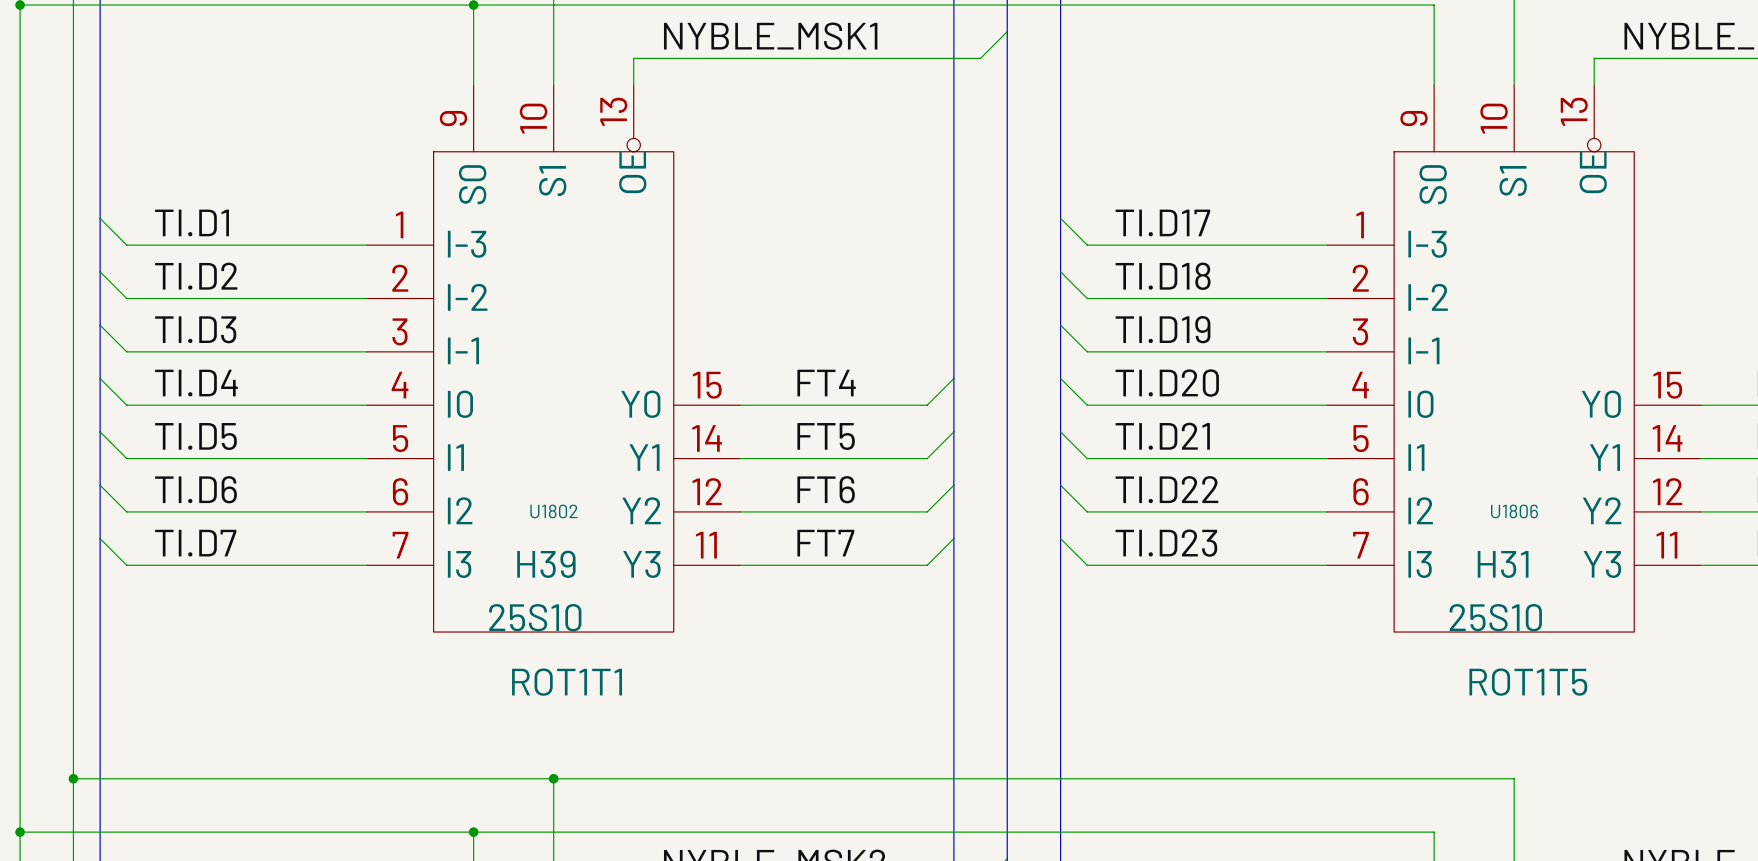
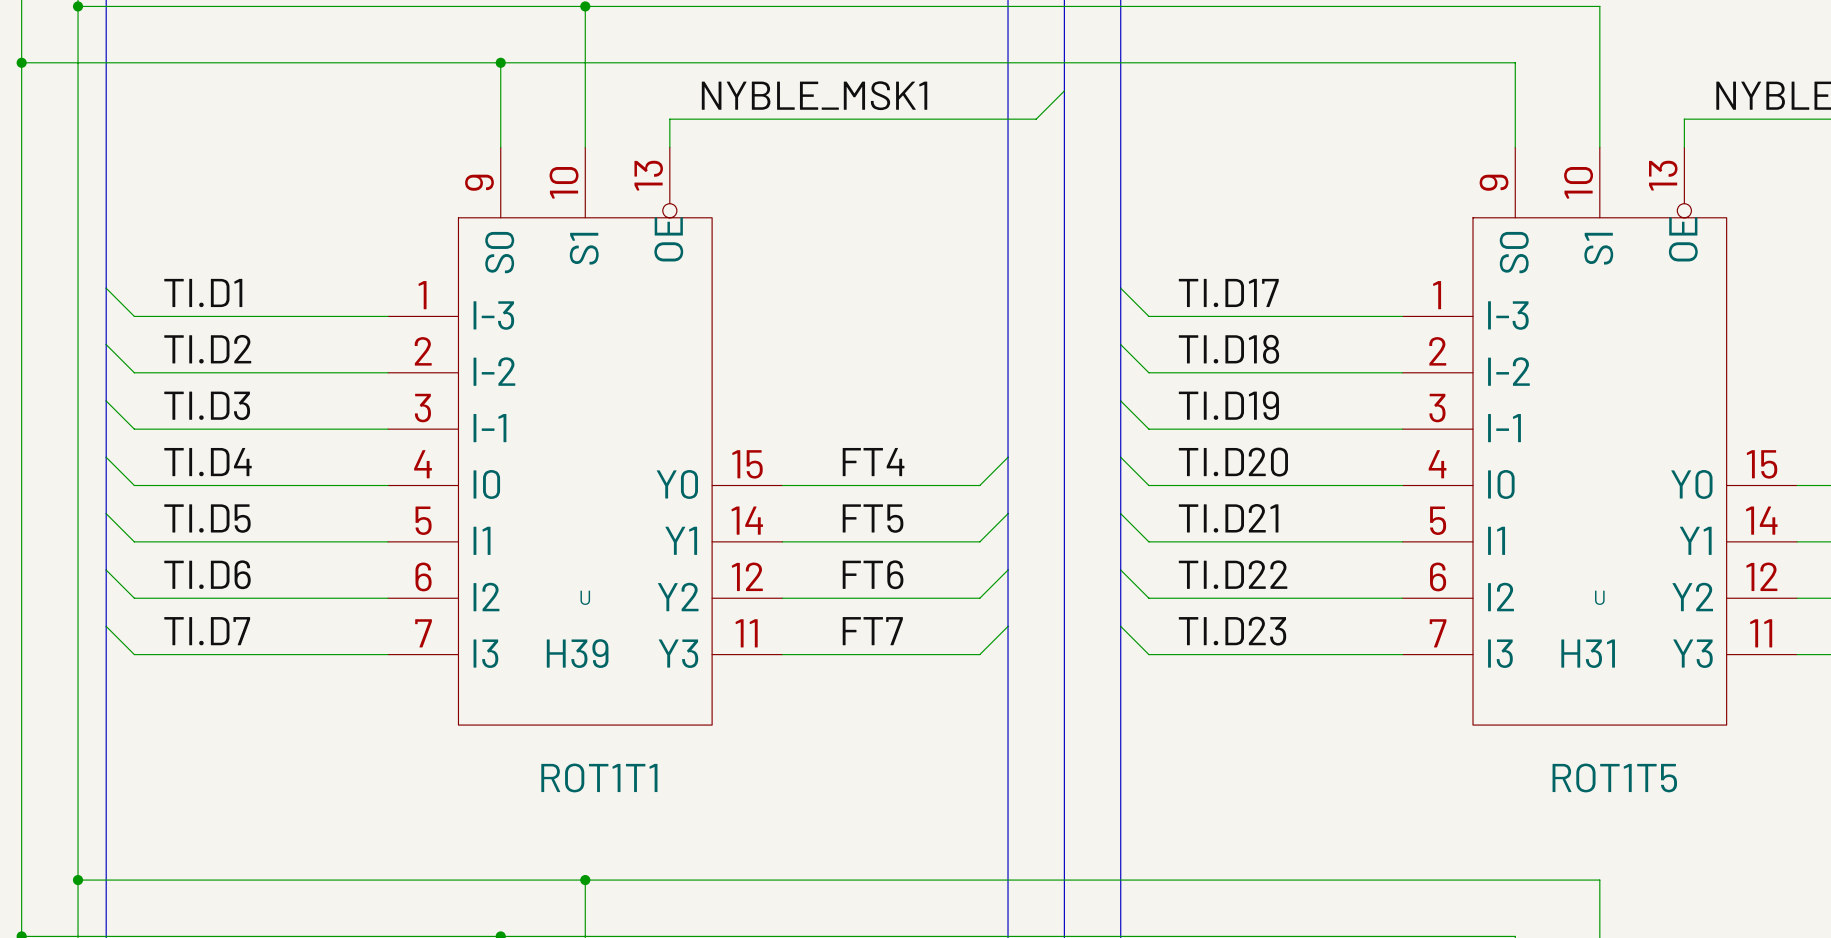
U1802 name: U1802 (553, 511) -> U (585, 597)
U1806 name: U1806 (1514, 511) -> U (1599, 597)
U1802 value: 25S10 (535, 617) -> none
U1806 value: 25S10 (1495, 617) -> none

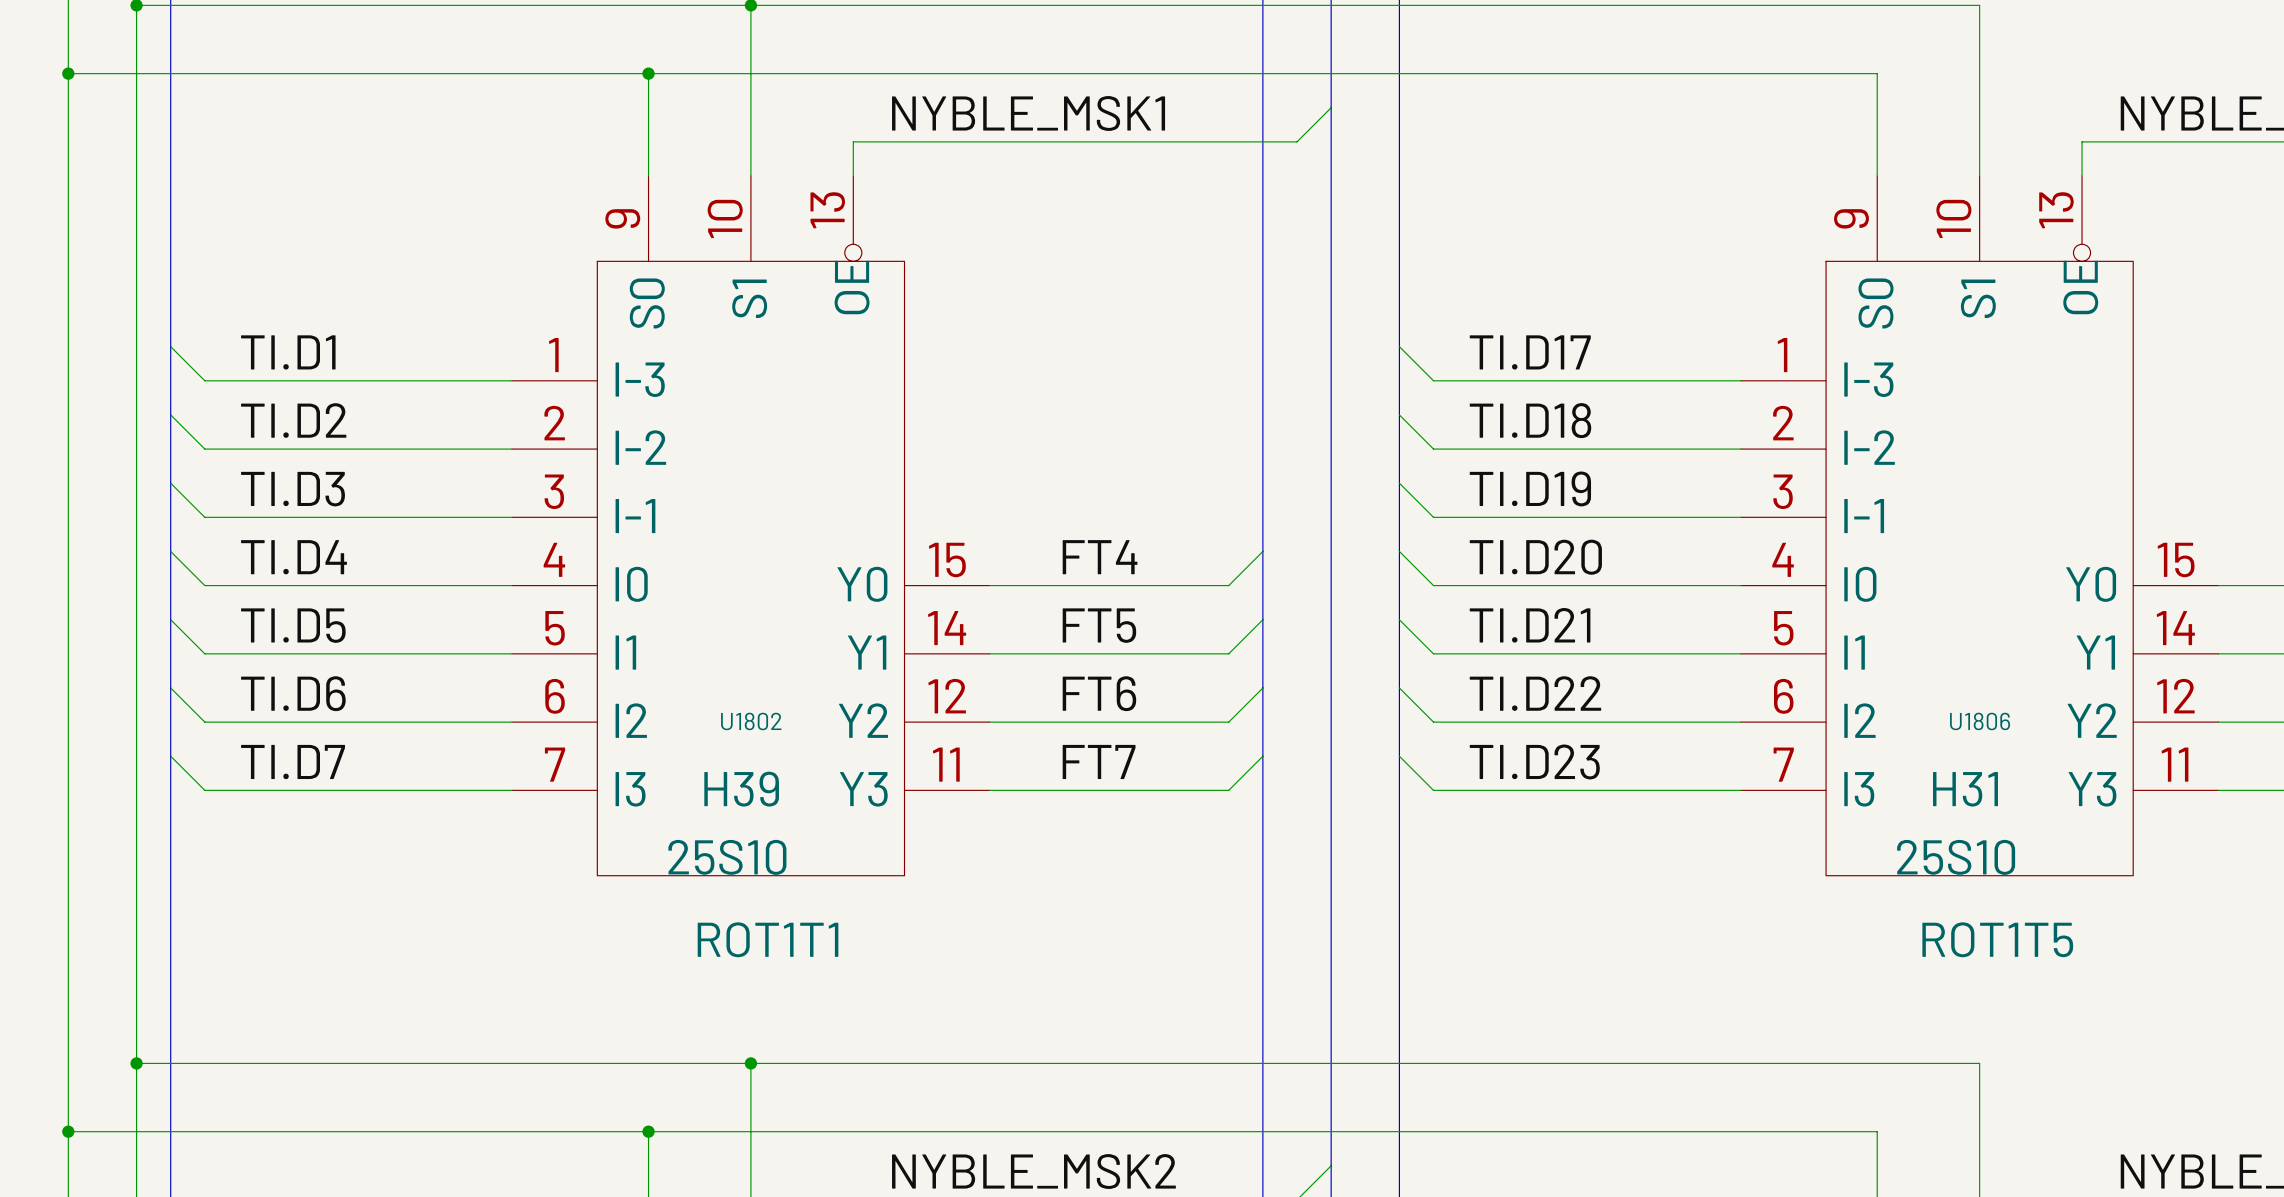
U name: U (585, 597) -> U1802 (751, 721)
U name: U (1599, 597) -> U1806 (1980, 721)
U value: none -> 25S10 (727, 857)
U value: none -> 25S10 (1956, 857)

